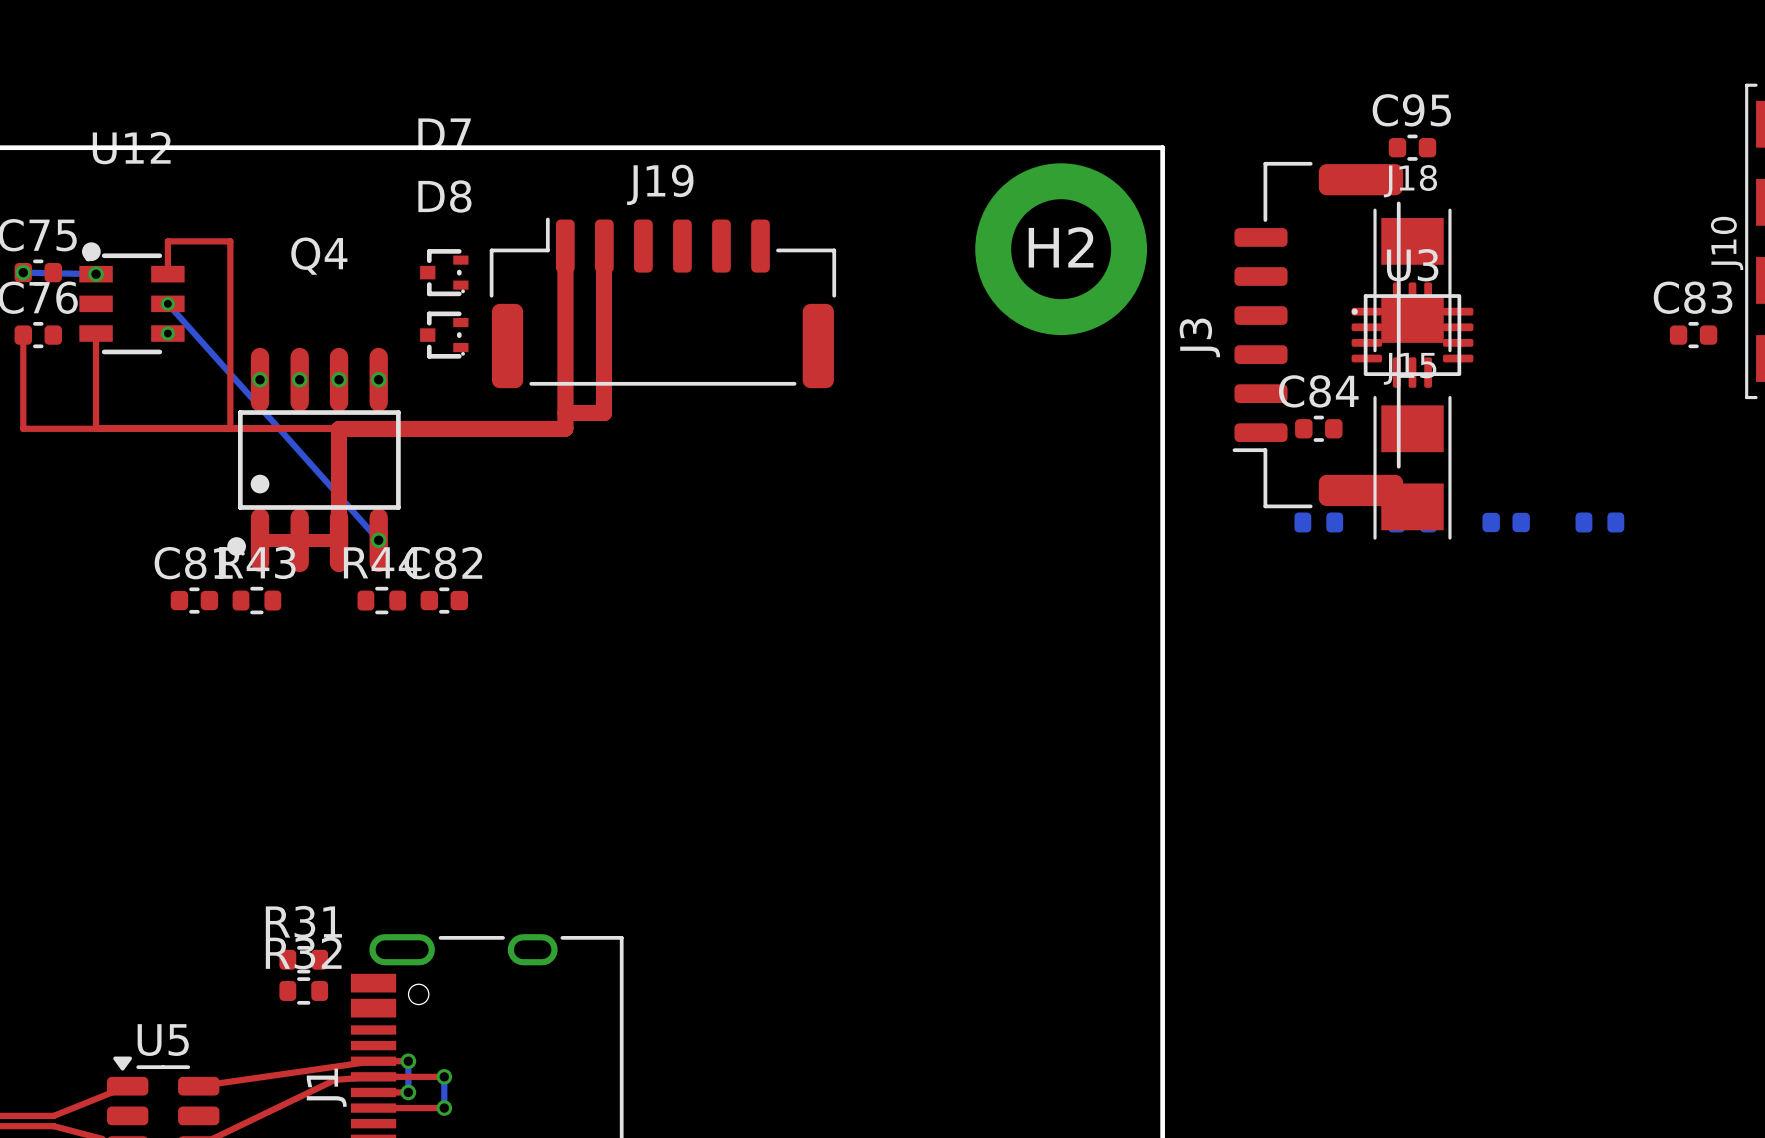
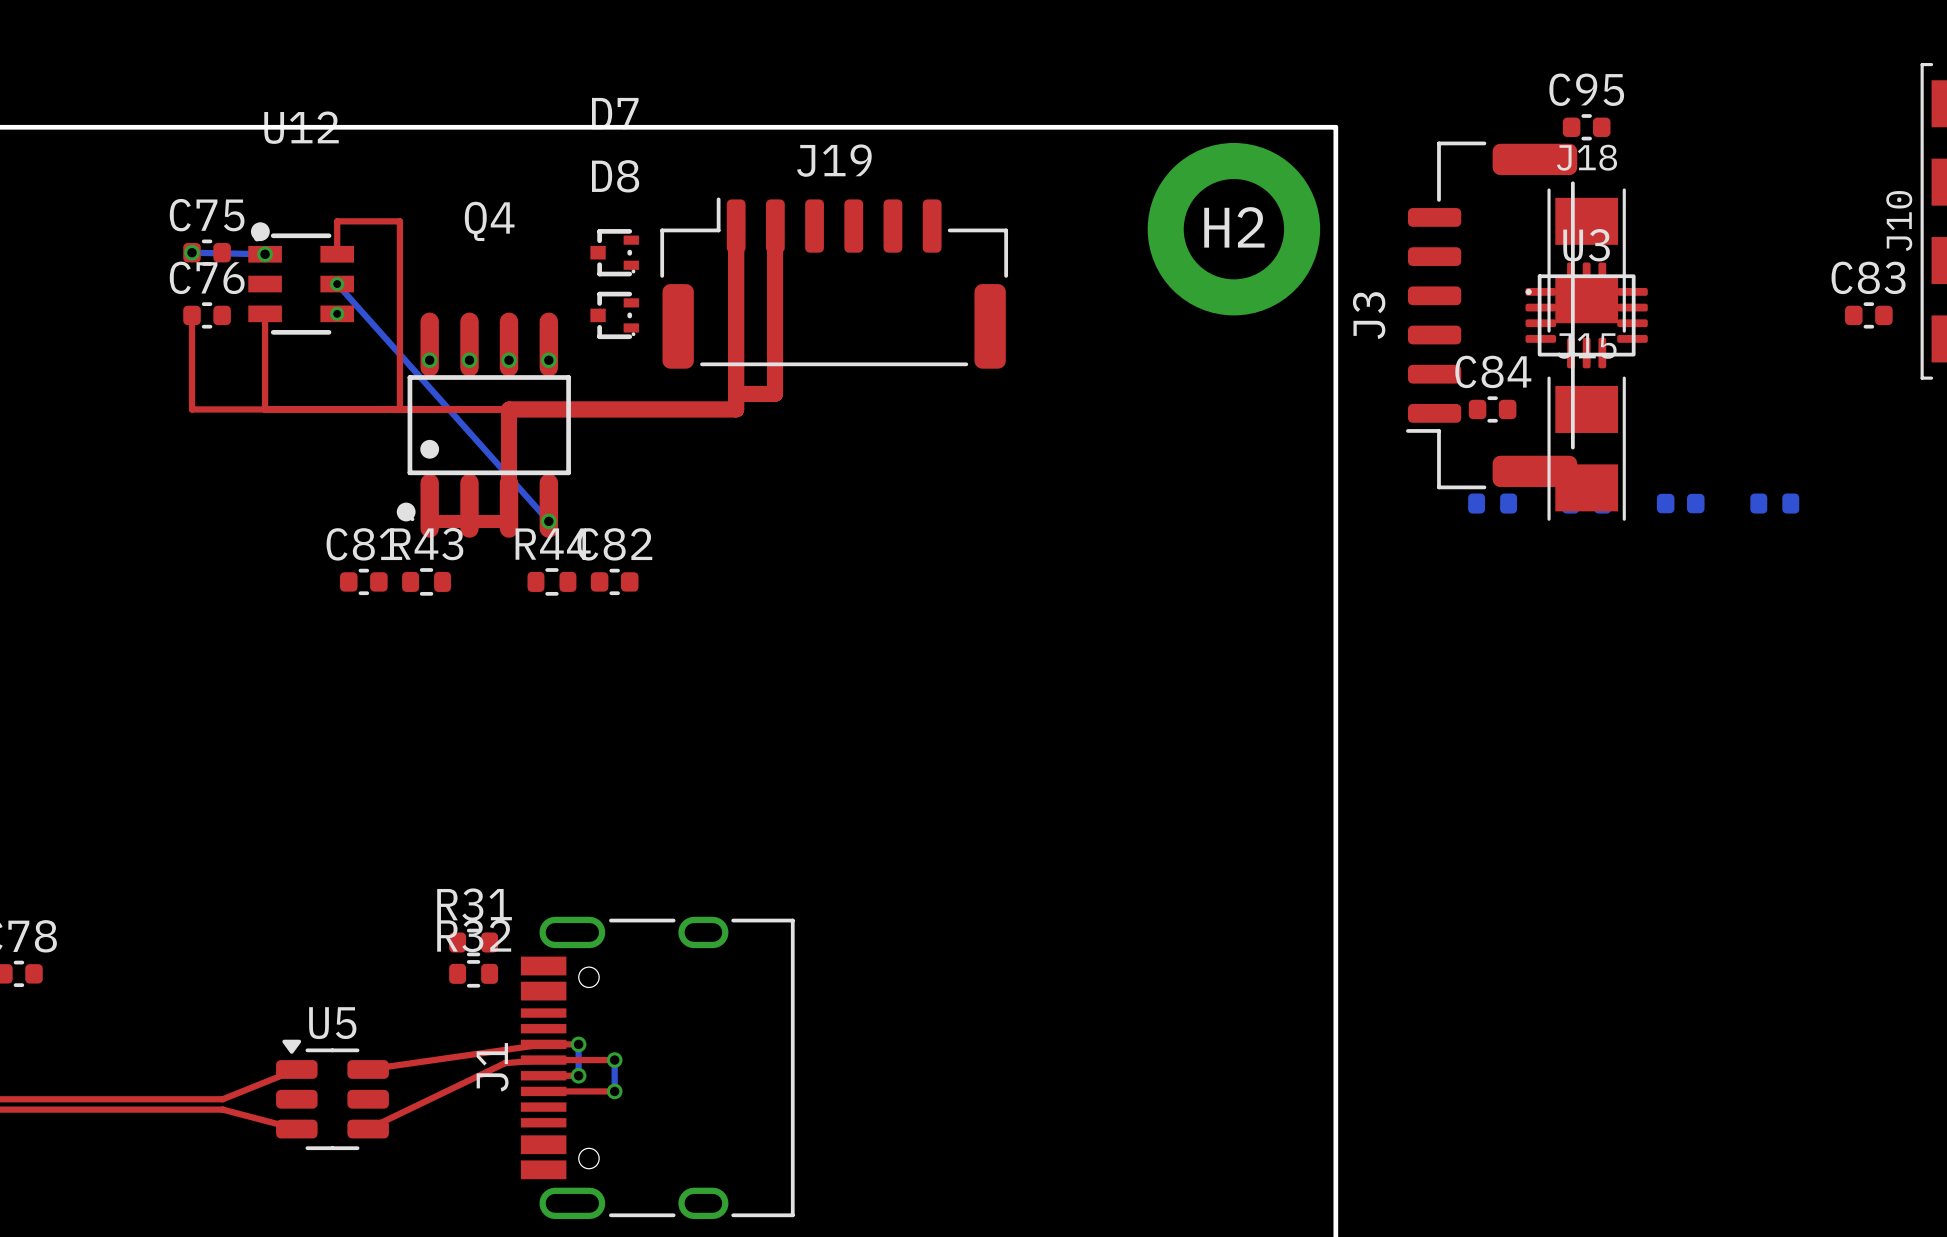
Q4 position: (313, 460) -> (483, 425)

